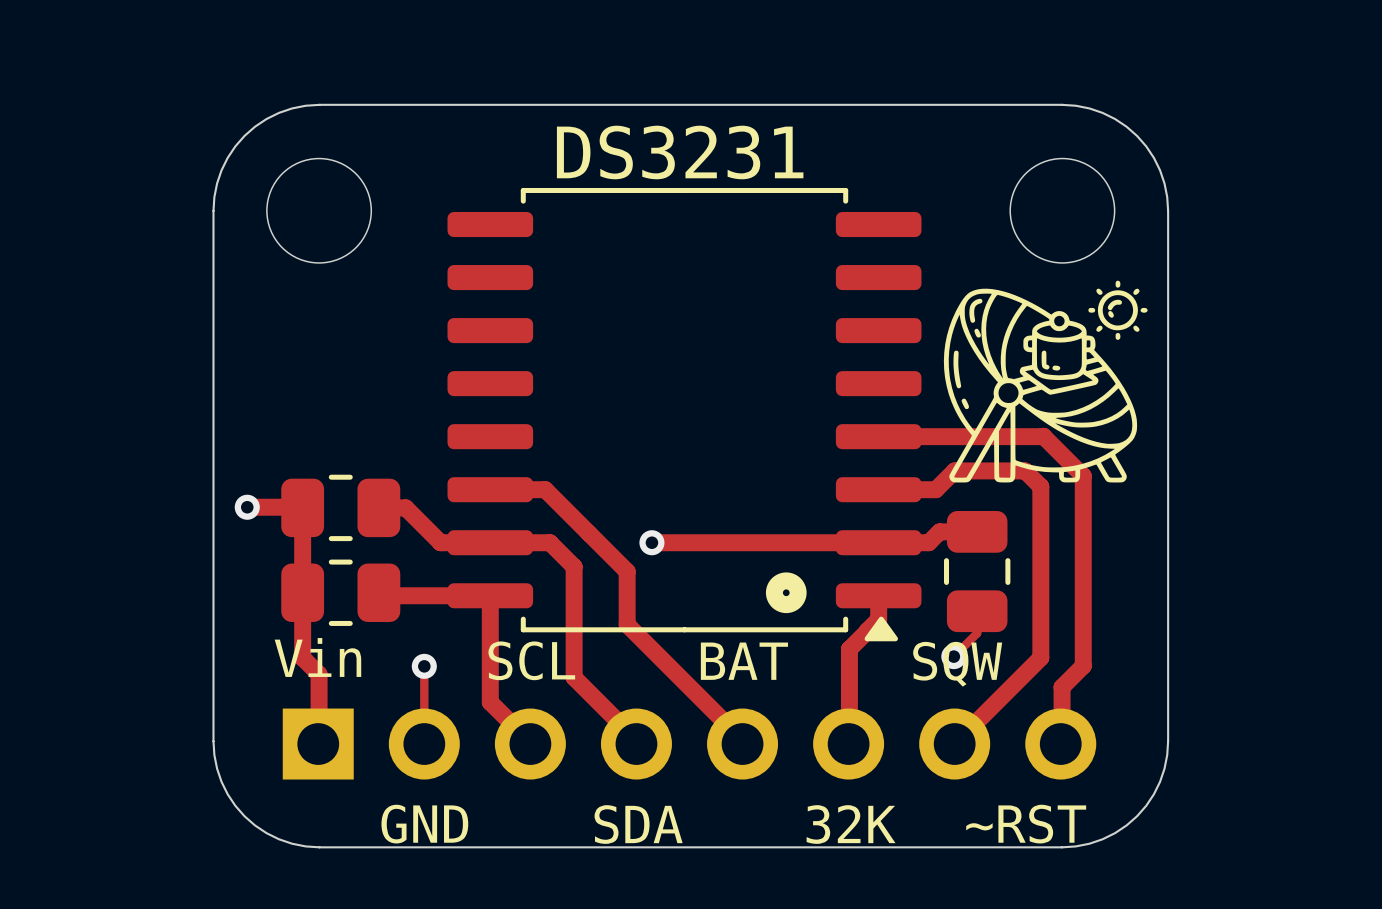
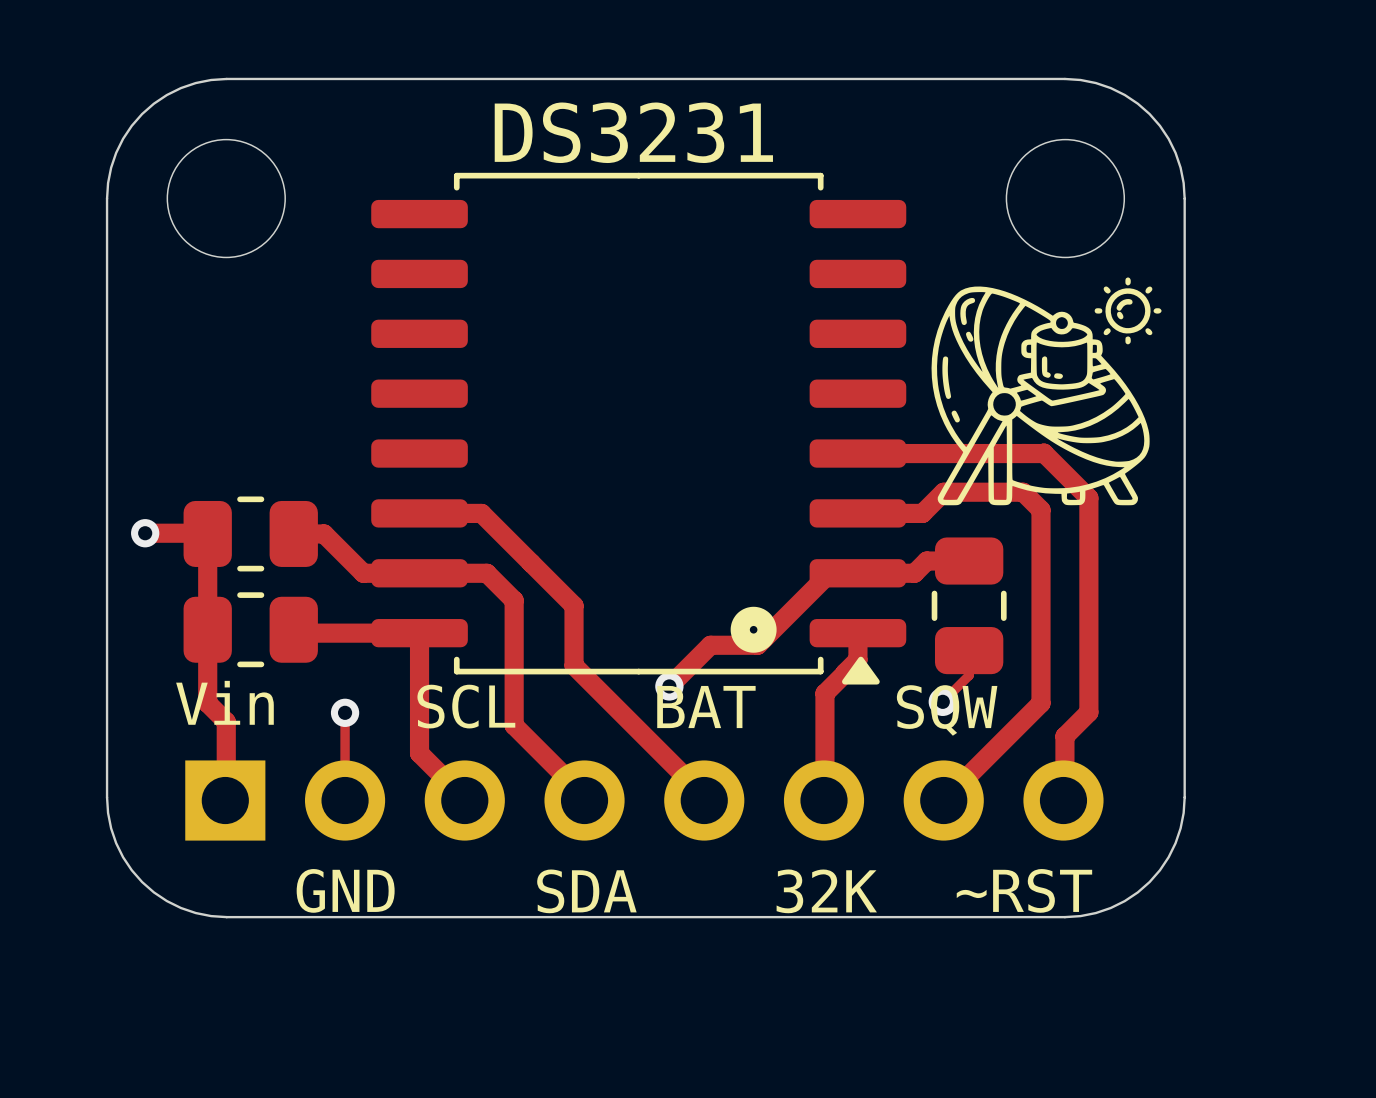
track: (651, 542) (853, 542) -> (669, 686) (710, 645) (757, 645) (829, 573)
via position: (651, 542) -> (669, 686)

